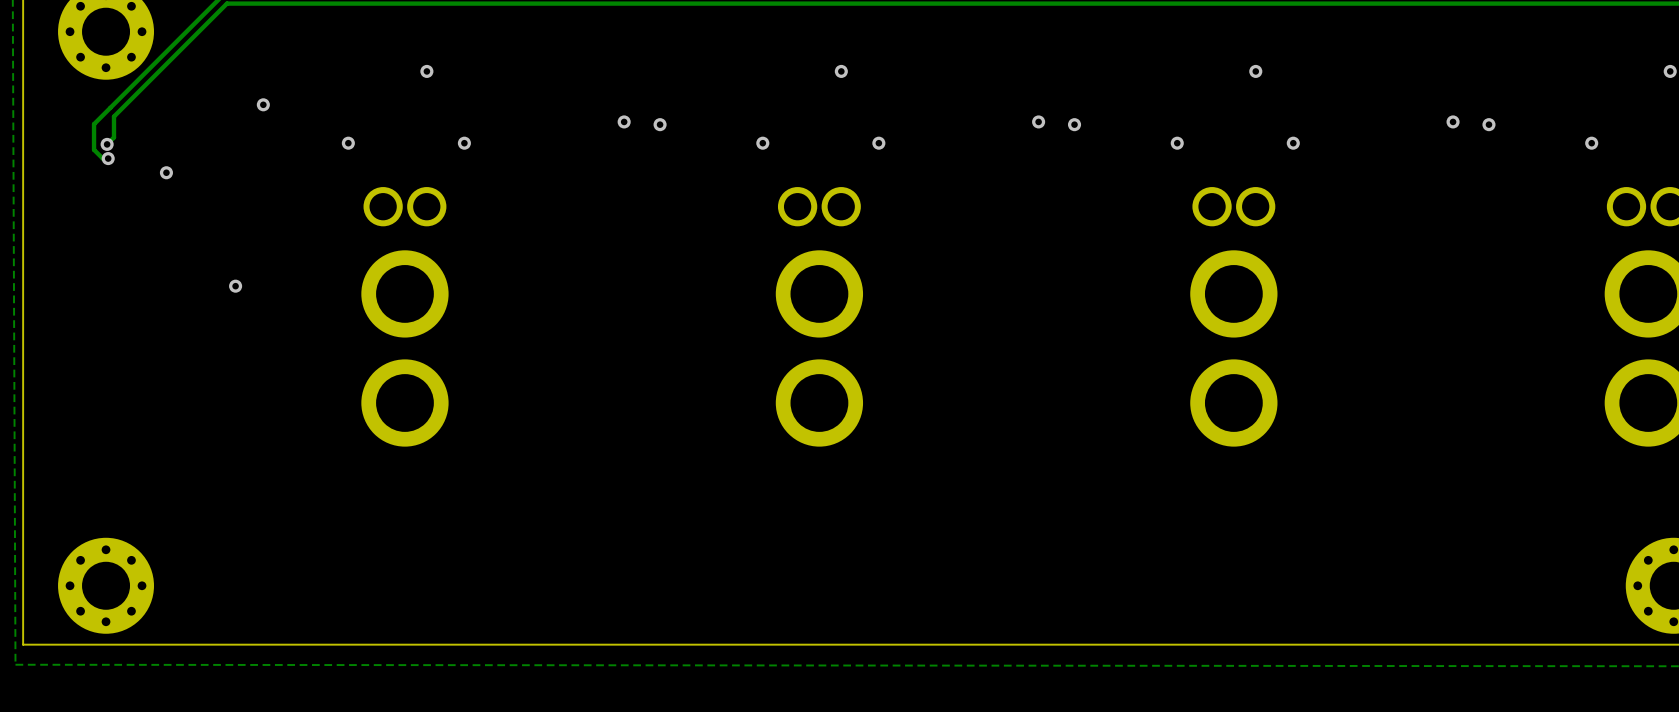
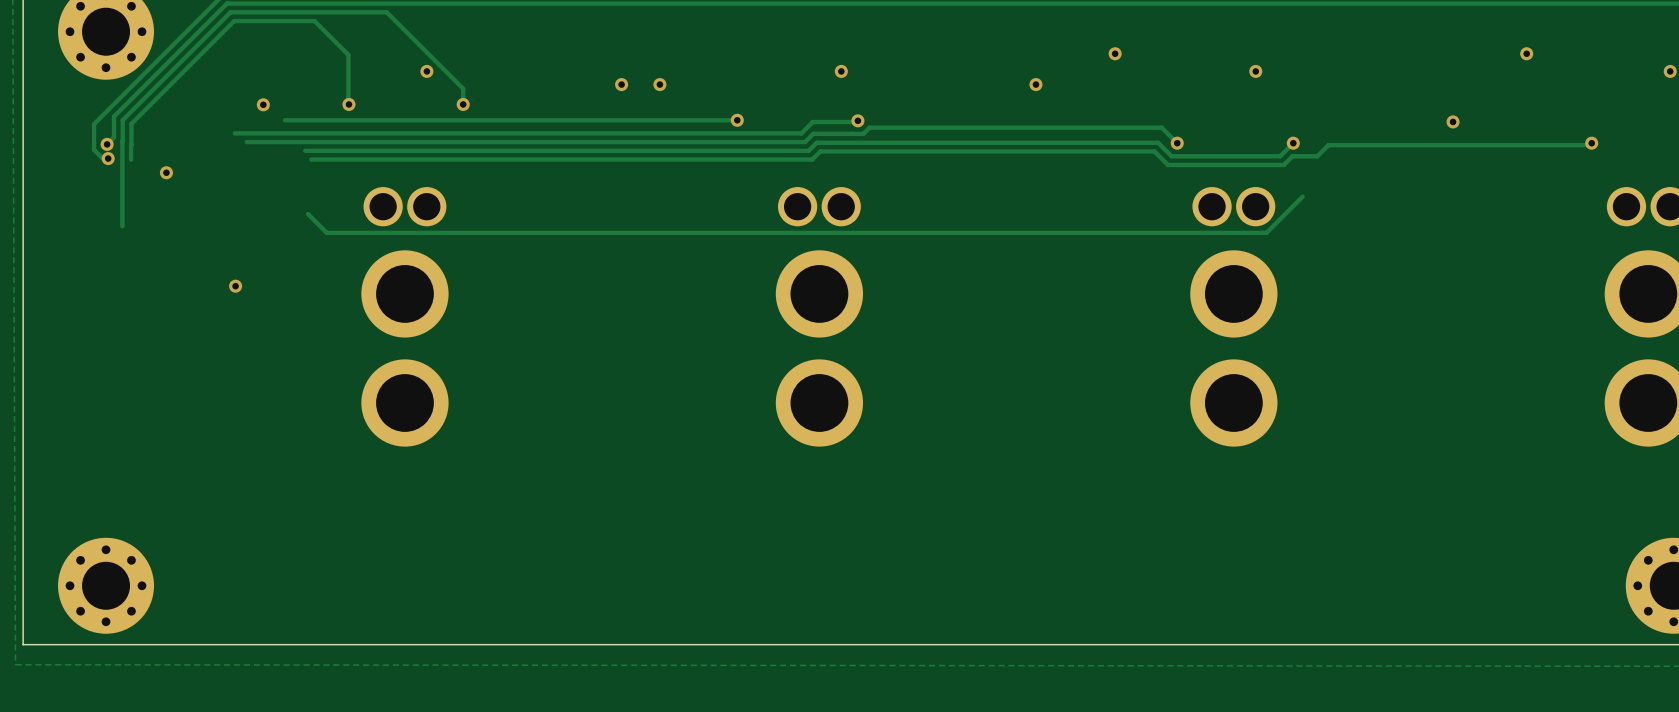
via: none -> (1115, 53)
via: none -> (621, 84)
via: none -> (659, 84)
via: none -> (1035, 84)
track: none -> (348, 104) (348, 54) (314, 21) (234, 21) (131, 123) (131, 159)
track: none -> (463, 104) (463, 88) (386, 12) (230, 12) (122, 120) (122, 226)
track: none -> (737, 120) (284, 120)
track: none -> (857, 120) (812, 122) (801, 133) (234, 133)
via: (624, 121) -> none
via: (1038, 121) -> none
via: (660, 124) -> none
via: (1074, 124) -> none
via position: (1488, 124) -> (1526, 53)
track: none -> (852, 133) (813, 133) (805, 142) (246, 142)
track: none -> (852, 133) (863, 133) (869, 127) (1161, 127) (1177, 143)
via position: (348, 143) -> (348, 104)
via position: (464, 143) -> (463, 104)
via position: (762, 143) -> (737, 120)
via position: (878, 143) -> (857, 120)
track: none -> (1293, 143) (1280, 156) (1171, 156) (1158, 142) (816, 142) (808, 150) (305, 150)
track: none -> (1591, 143) (1589, 145) (1328, 145) (1317, 156) (1292, 156) (1283, 165) (1167, 165) (1154, 151) (820, 151) (812, 159) (311, 159)
track: none -> (1302, 196) (1266, 232) (326, 232) (308, 214)

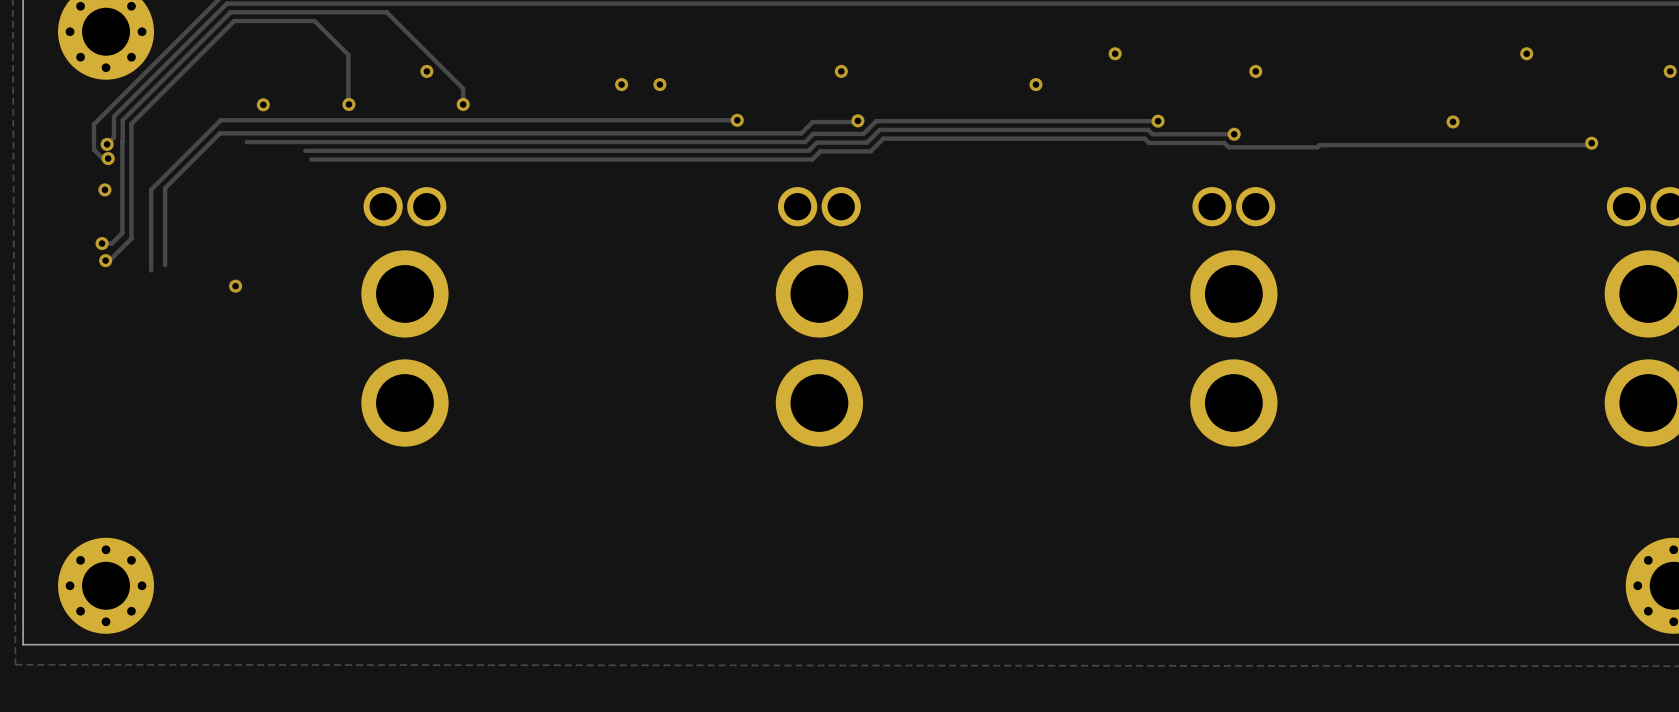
track: none -> (284, 120) (220, 120) (151, 189) (151, 270)
via: none -> (1158, 121)
track: none -> (234, 133) (219, 133) (165, 188) (165, 265)
track: (863, 133) (869, 127) (1161, 127) (1177, 143) -> (863, 133) (876, 121) (1158, 121)
via: none -> (1234, 134)
track: (816, 142) (1158, 142) (1171, 156) (1280, 156) (1293, 143) -> (816, 142) (867, 142) (879, 129) (1148, 129) (1152, 134) (1234, 134)
via: (1177, 143) -> none
via: (1293, 143) -> none
track: (131, 144) (131, 159) -> (131, 144) (131, 238) (109, 260) (105, 260)
track: (1328, 145) (1317, 156) (1292, 156) (1283, 165) (1167, 165) (1154, 151) (820, 151) -> (1328, 145) (1319, 145) (1317, 147) (1228, 147) (1224, 142) (1149, 142) (1144, 138) (883, 138) (870, 151) (820, 151)
via: (166, 172) -> none
via: none -> (104, 189)
track: (1302, 196) (1266, 232) (326, 232) (308, 214) -> none
track: none -> (122, 226) (122, 233) (111, 243) (104, 243)
via: none -> (102, 243)
via: none -> (105, 260)

